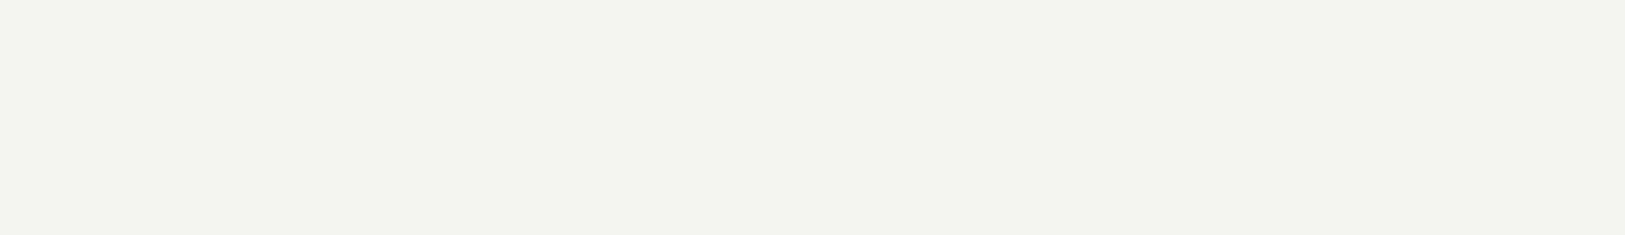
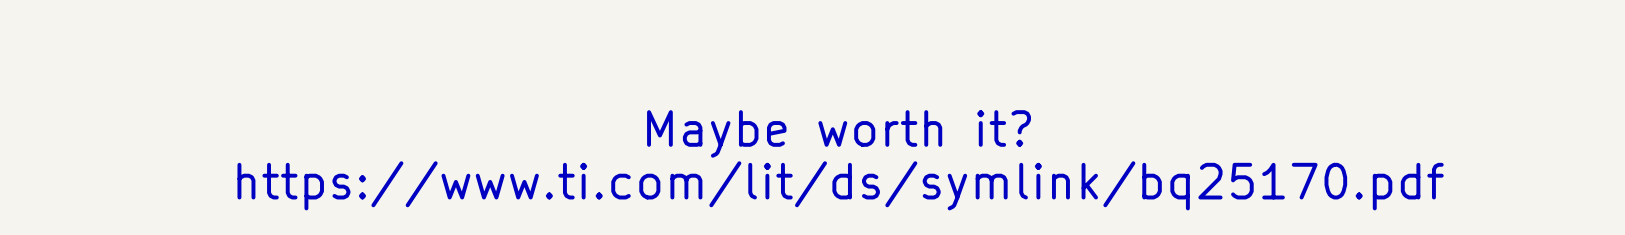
text: none -> Maybe worth it? (839, 133)
text: none -> https://www.ti.com/lit/ds/symlink/bq25170.pdf (840, 185)

